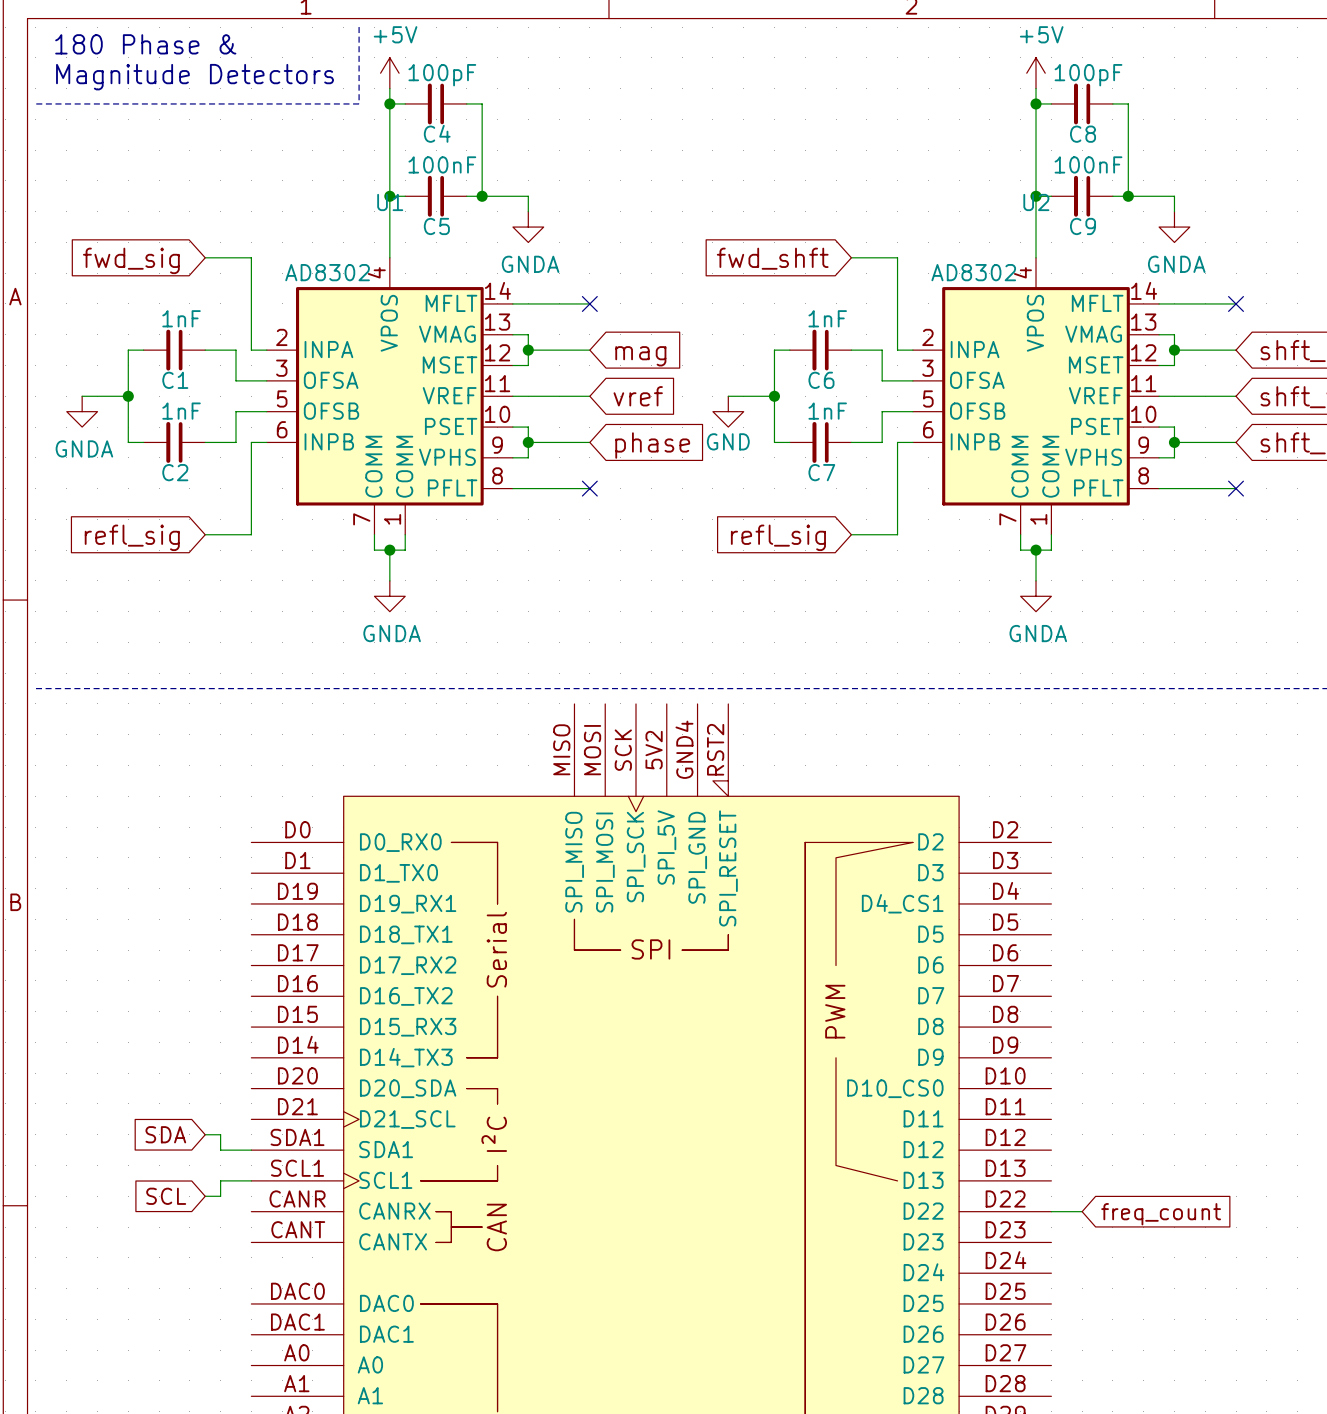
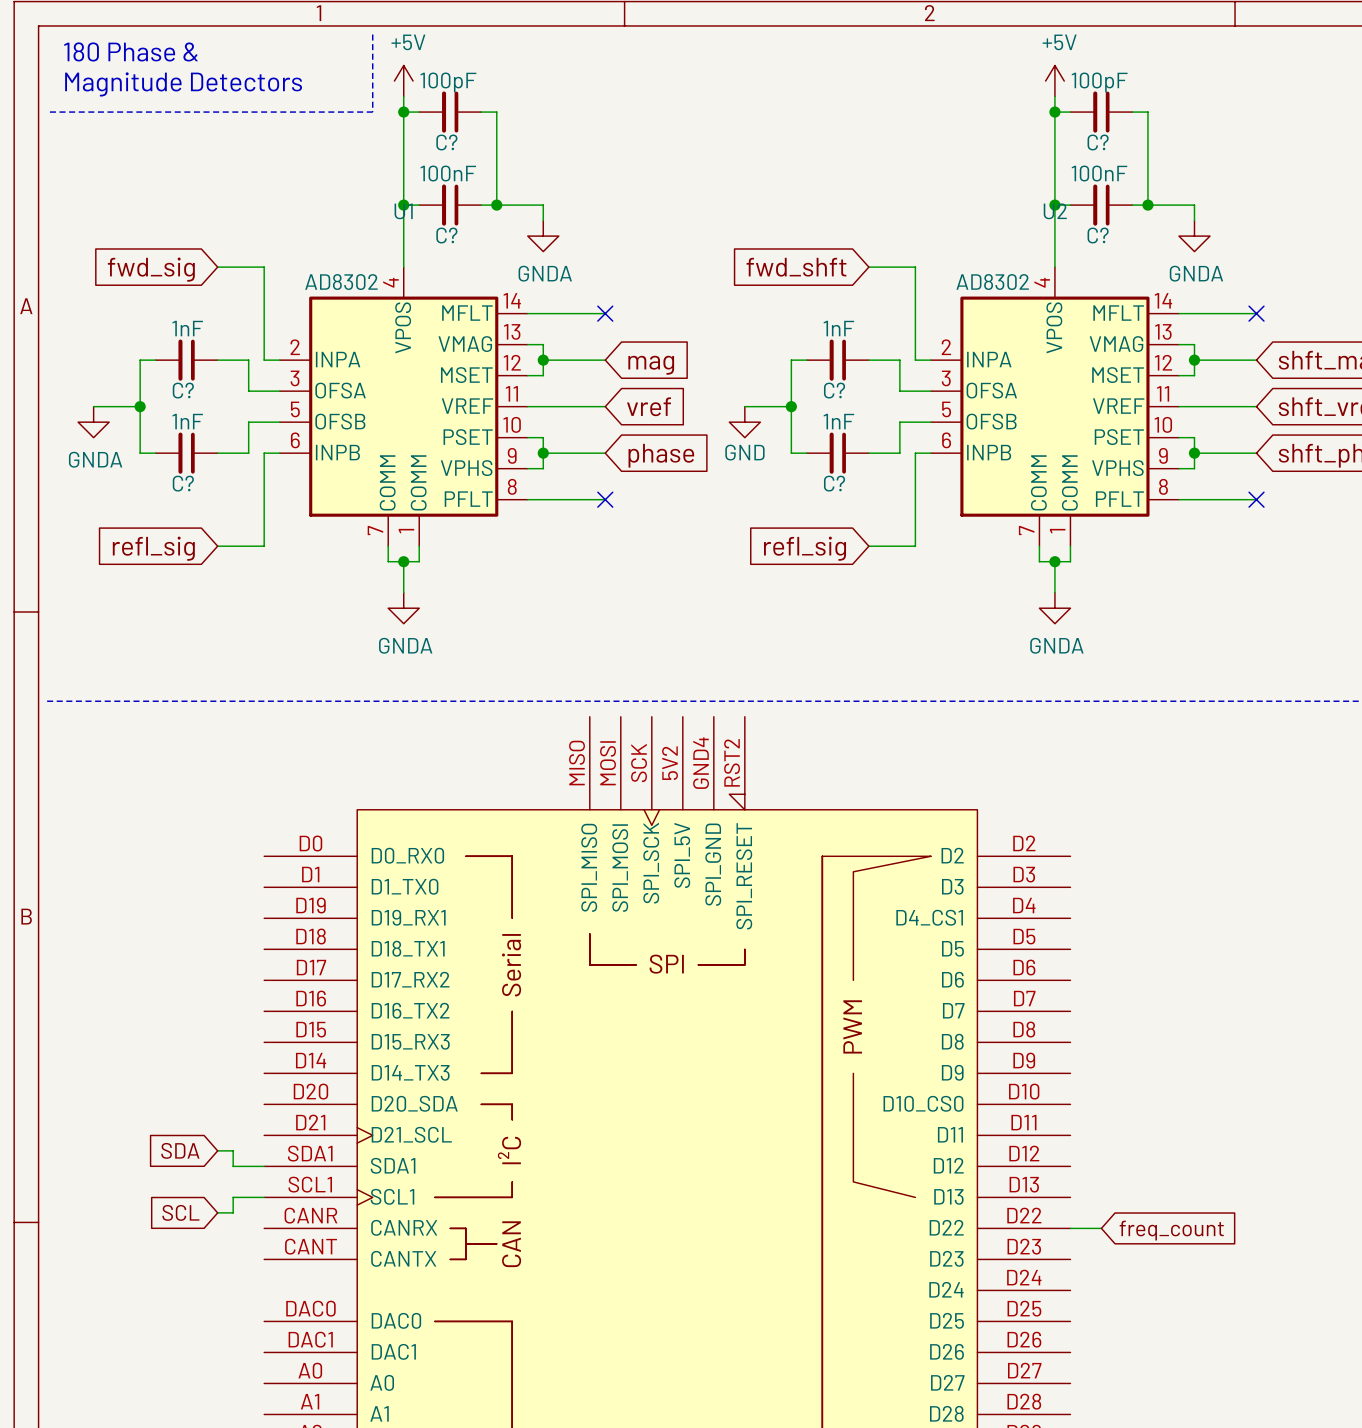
C4 name: C4 (437, 133) -> C? (446, 142)
C8 name: C8 (1083, 134) -> C? (1098, 142)
C5 name: C5 (436, 226) -> C? (446, 235)
C9 name: C9 (1083, 226) -> C? (1098, 235)
C1 name: C1 (175, 380) -> C? (183, 390)
C6 name: C6 (821, 380) -> C? (834, 390)
C2 name: C2 (175, 472) -> C? (183, 483)
C7 name: C7 (821, 472) -> C? (834, 483)

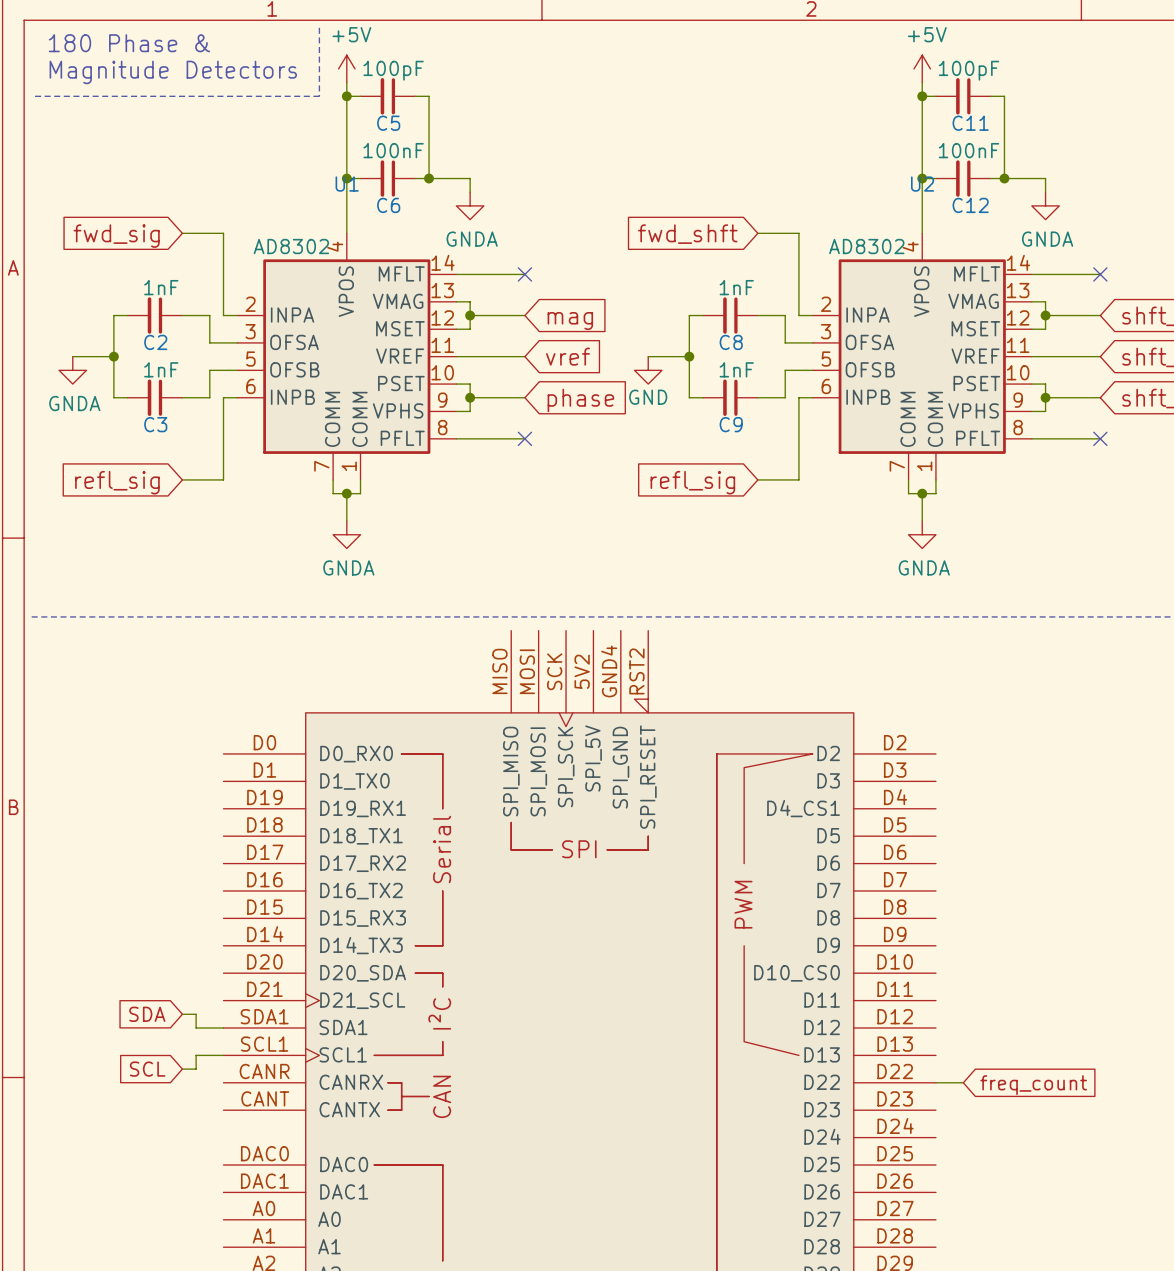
C? name: C? (446, 142) -> C5 (388, 123)
C? name: C? (1098, 142) -> C11 (970, 123)
C? name: C? (446, 235) -> C6 (388, 205)
C? name: C? (1098, 235) -> C12 (970, 205)
C? name: C? (183, 390) -> C2 (155, 342)
C? name: C? (834, 390) -> C8 (731, 342)
C? name: C? (183, 483) -> C3 (155, 424)
C? name: C? (834, 483) -> C9 (731, 424)

